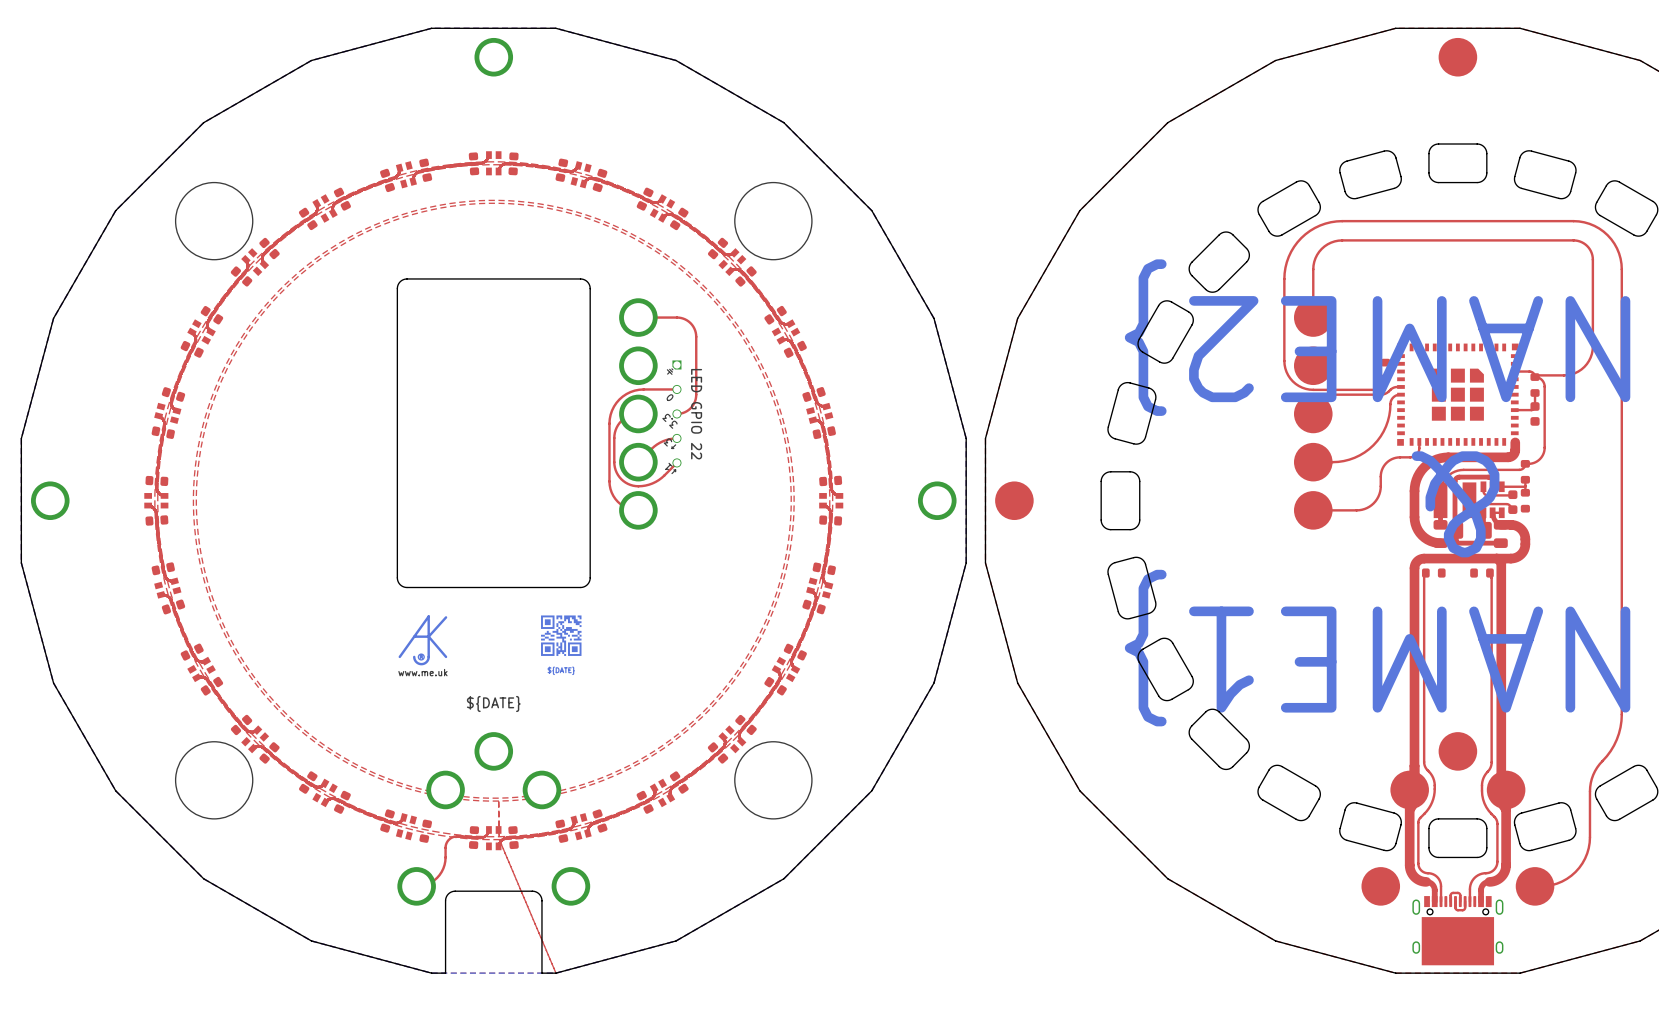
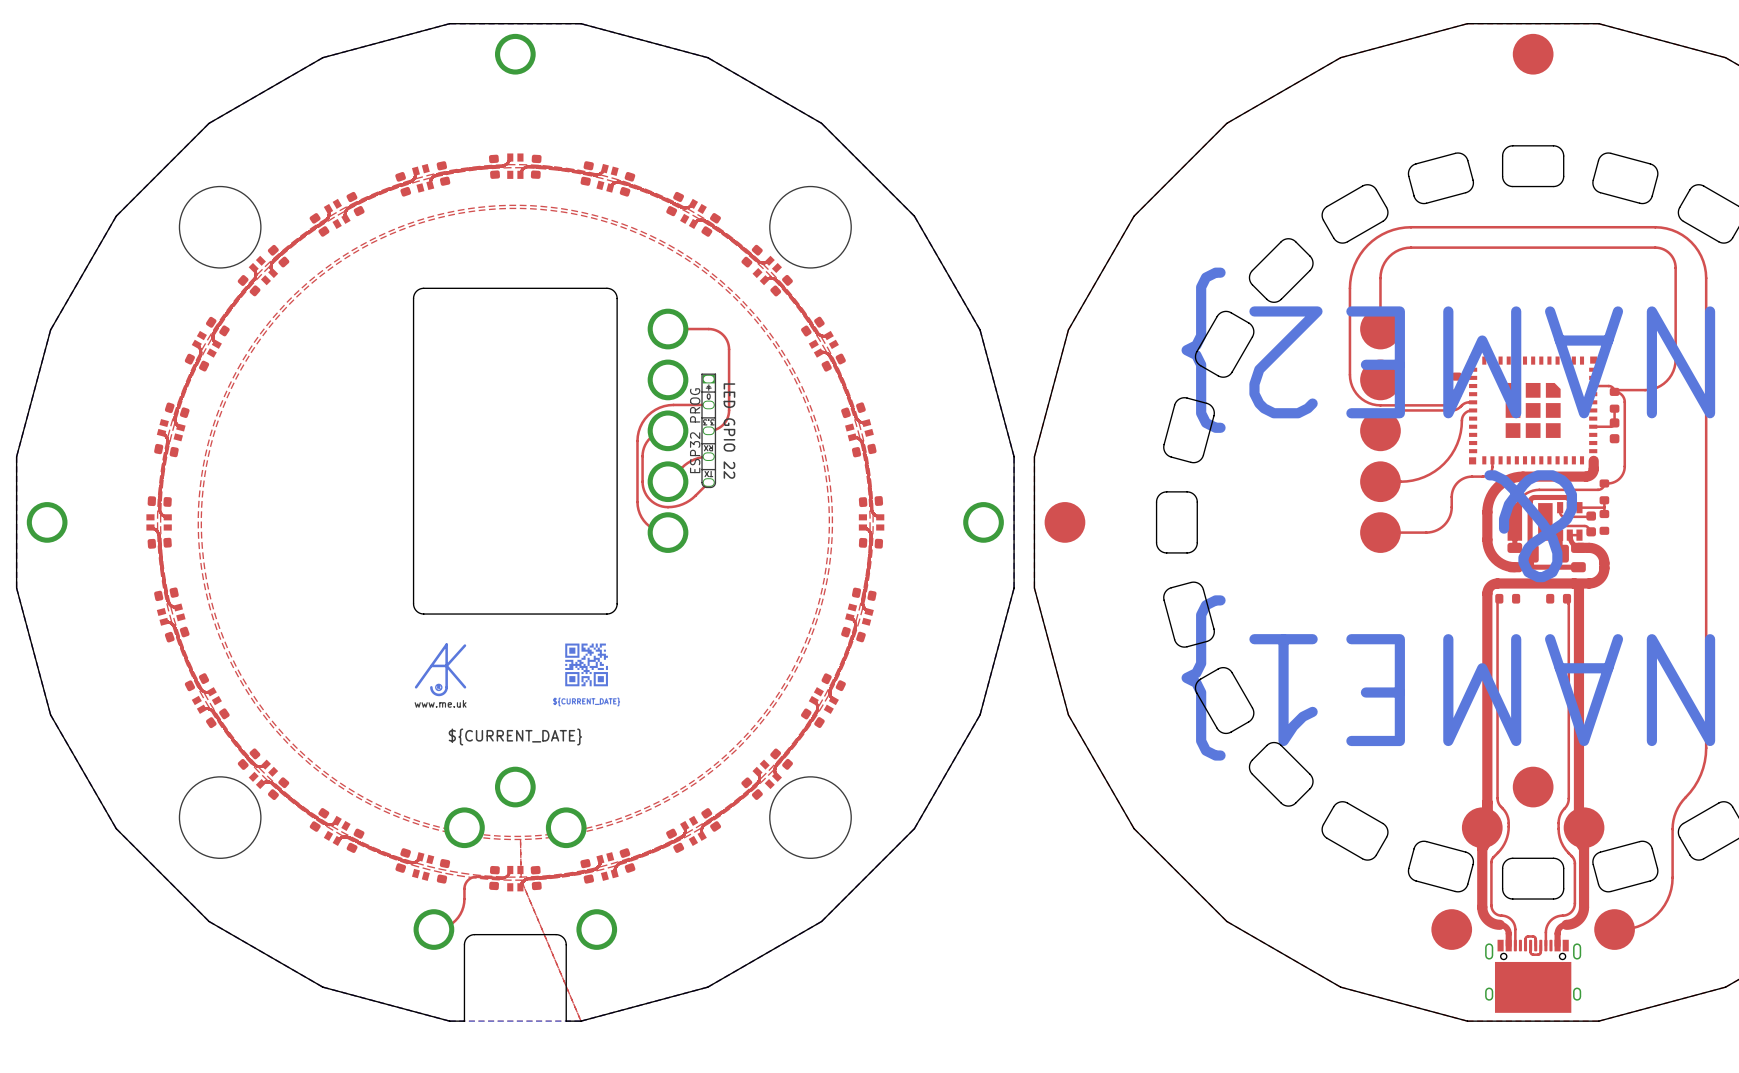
part footprint: [672, 360, 682, 468] -> [701, 373, 716, 488]
part footprint: [541, 615, 582, 656] -> [565, 643, 608, 687]
text: ${DATE} (493, 703) -> ${CURRENT_DATE} (515, 736)

